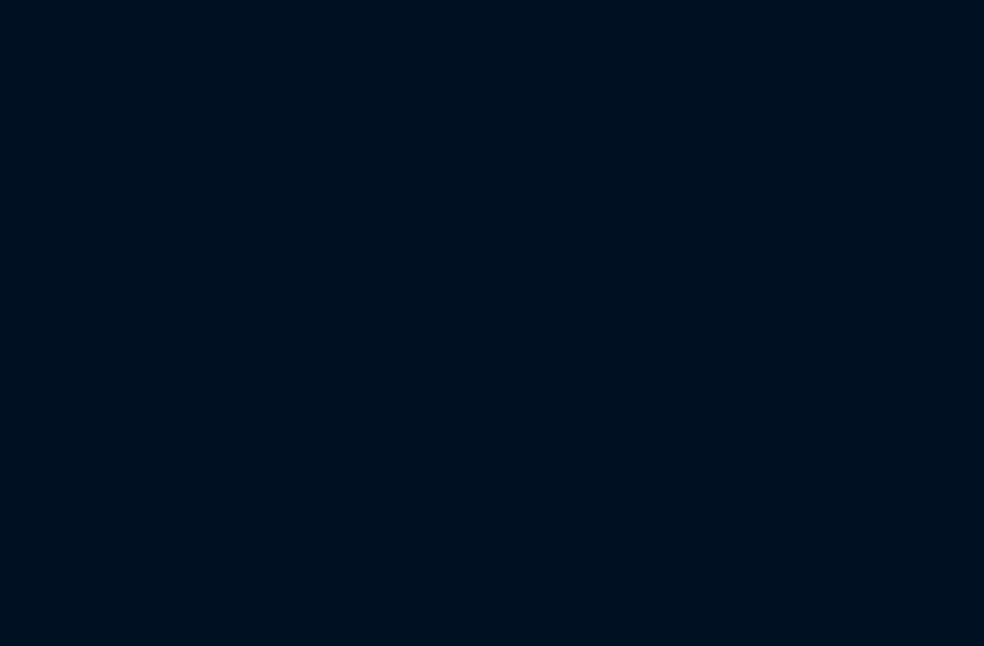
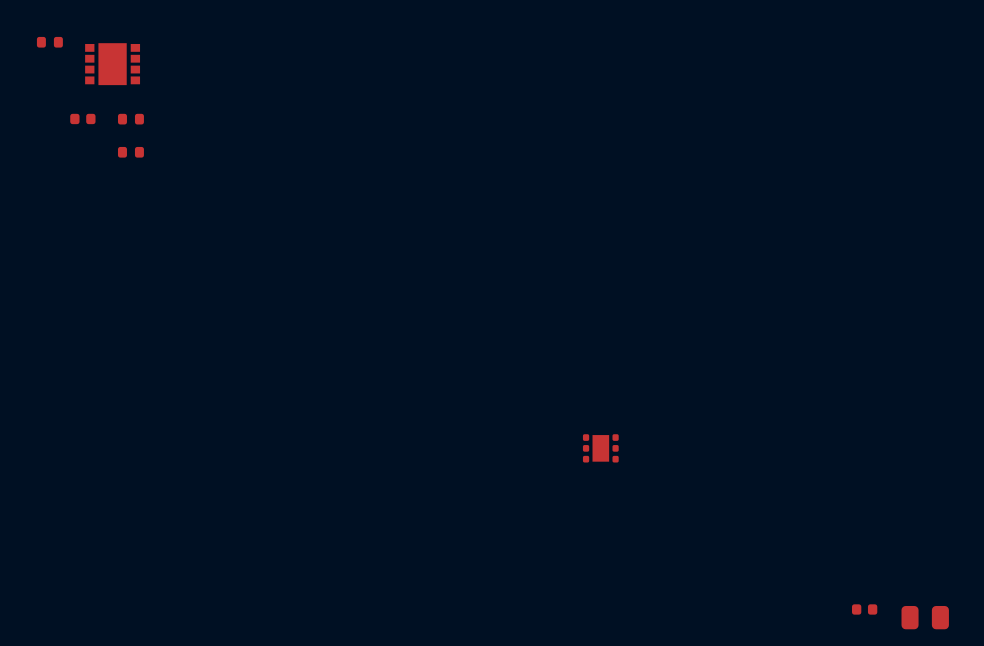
part: none -> (49, 42)
part: none -> (112, 64)
part: none -> (82, 118)
part: none -> (130, 119)
part: none -> (130, 152)
part: none -> (600, 448)
part: none -> (864, 609)
part: none -> (925, 617)

